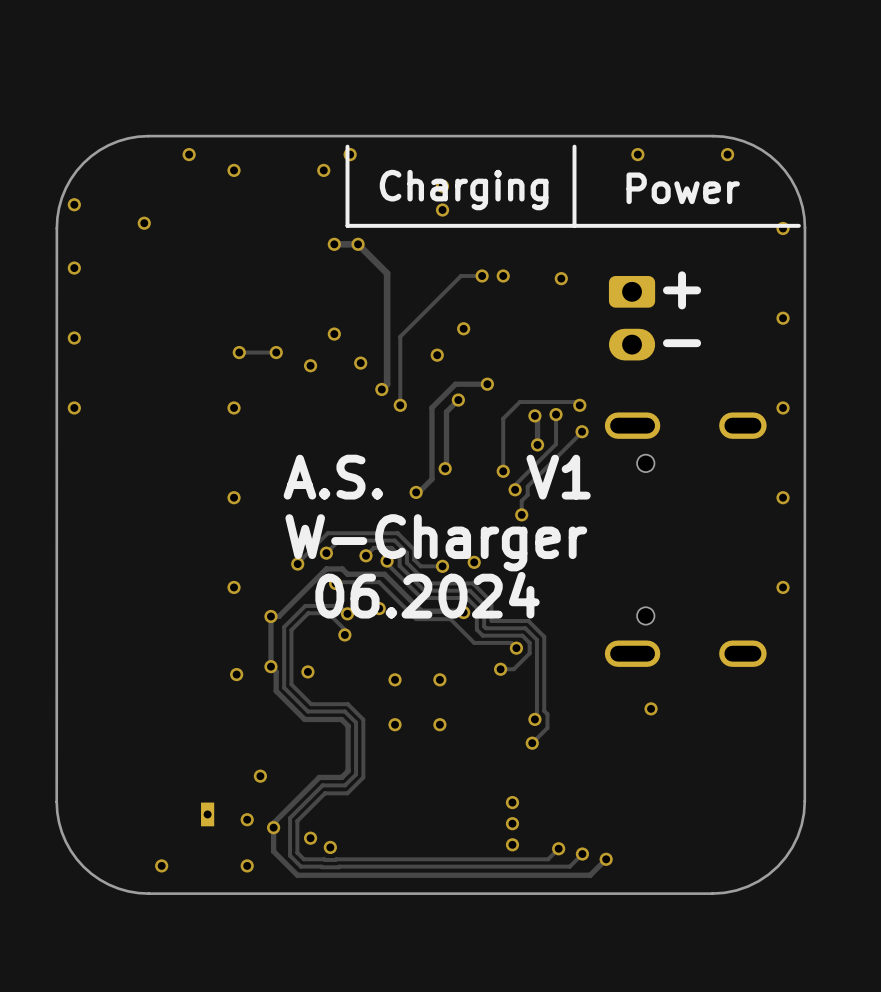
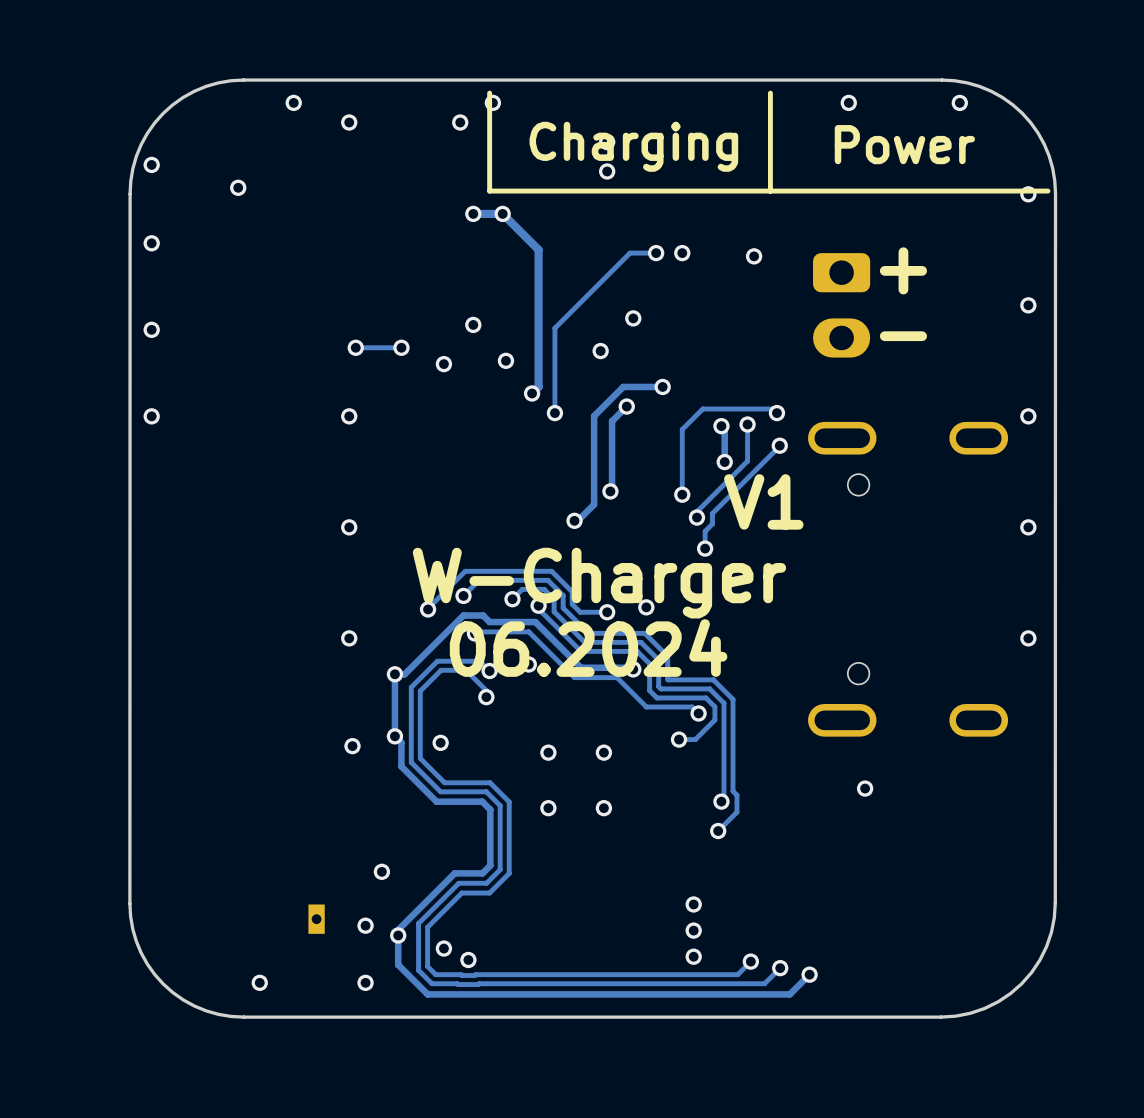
text: A.S. V1 (437, 477) -> V1 (763, 501)

